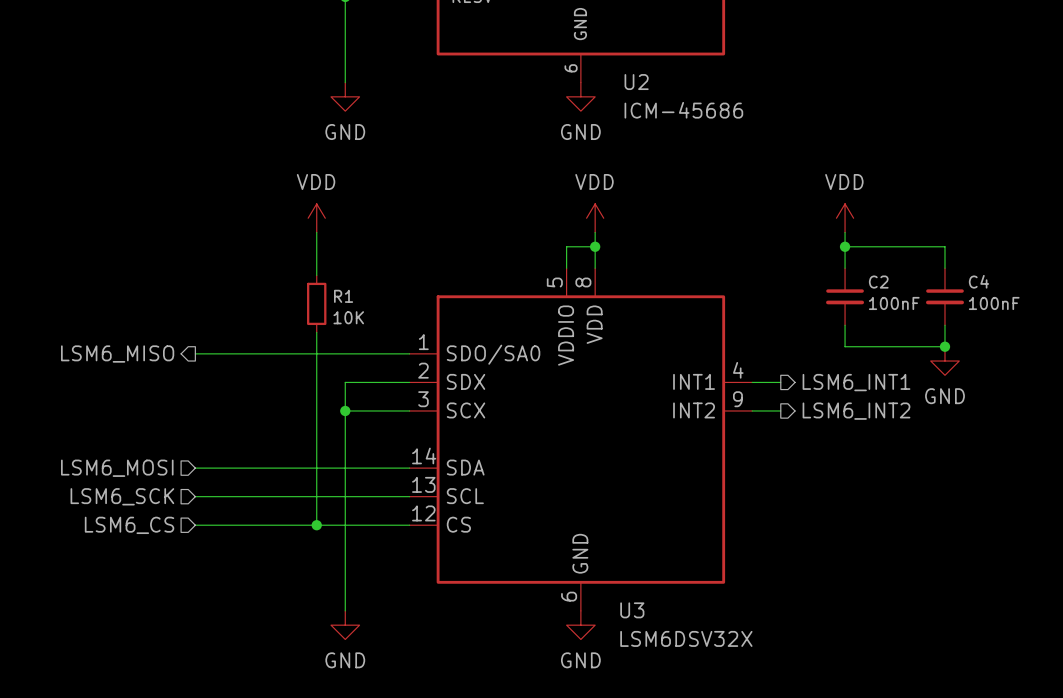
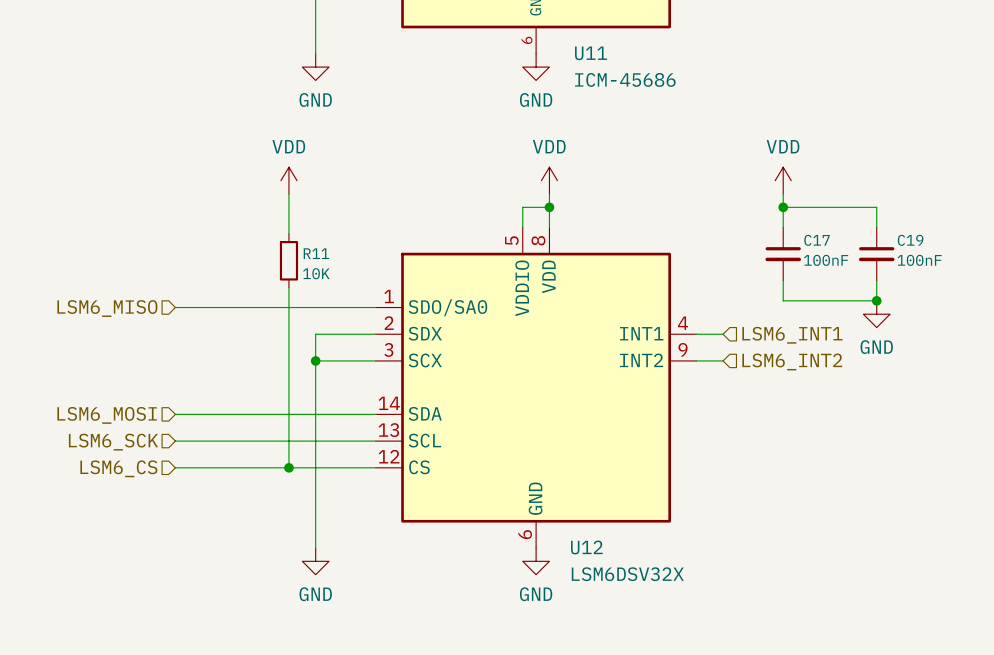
U2 name: U2 (636, 82) -> U11 (591, 53)
C4 name: C4 (978, 281) -> C19 (910, 240)
C2 name: C2 (878, 282) -> C17 (817, 240)
R1 name: R1 (343, 296) -> R11 (316, 253)
hierarchical label shape: output (117, 354) -> input (107, 308)
hierarchical label shape: output (856, 382) -> input (792, 335)
hierarchical label shape: output (856, 411) -> input (792, 361)
U3 name: U3 (632, 610) -> U12 (586, 547)

